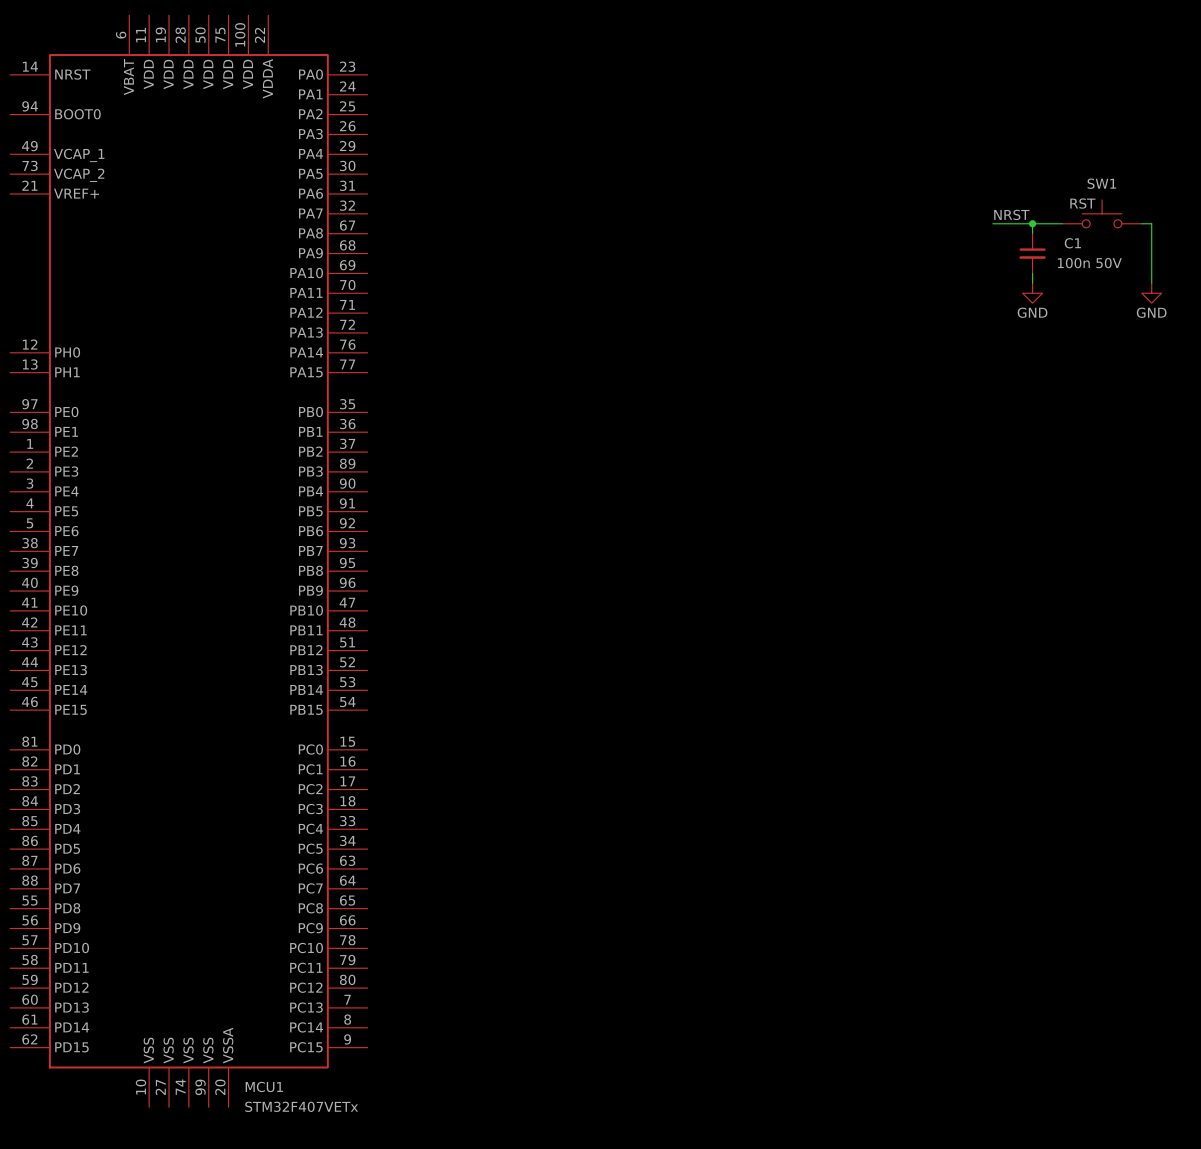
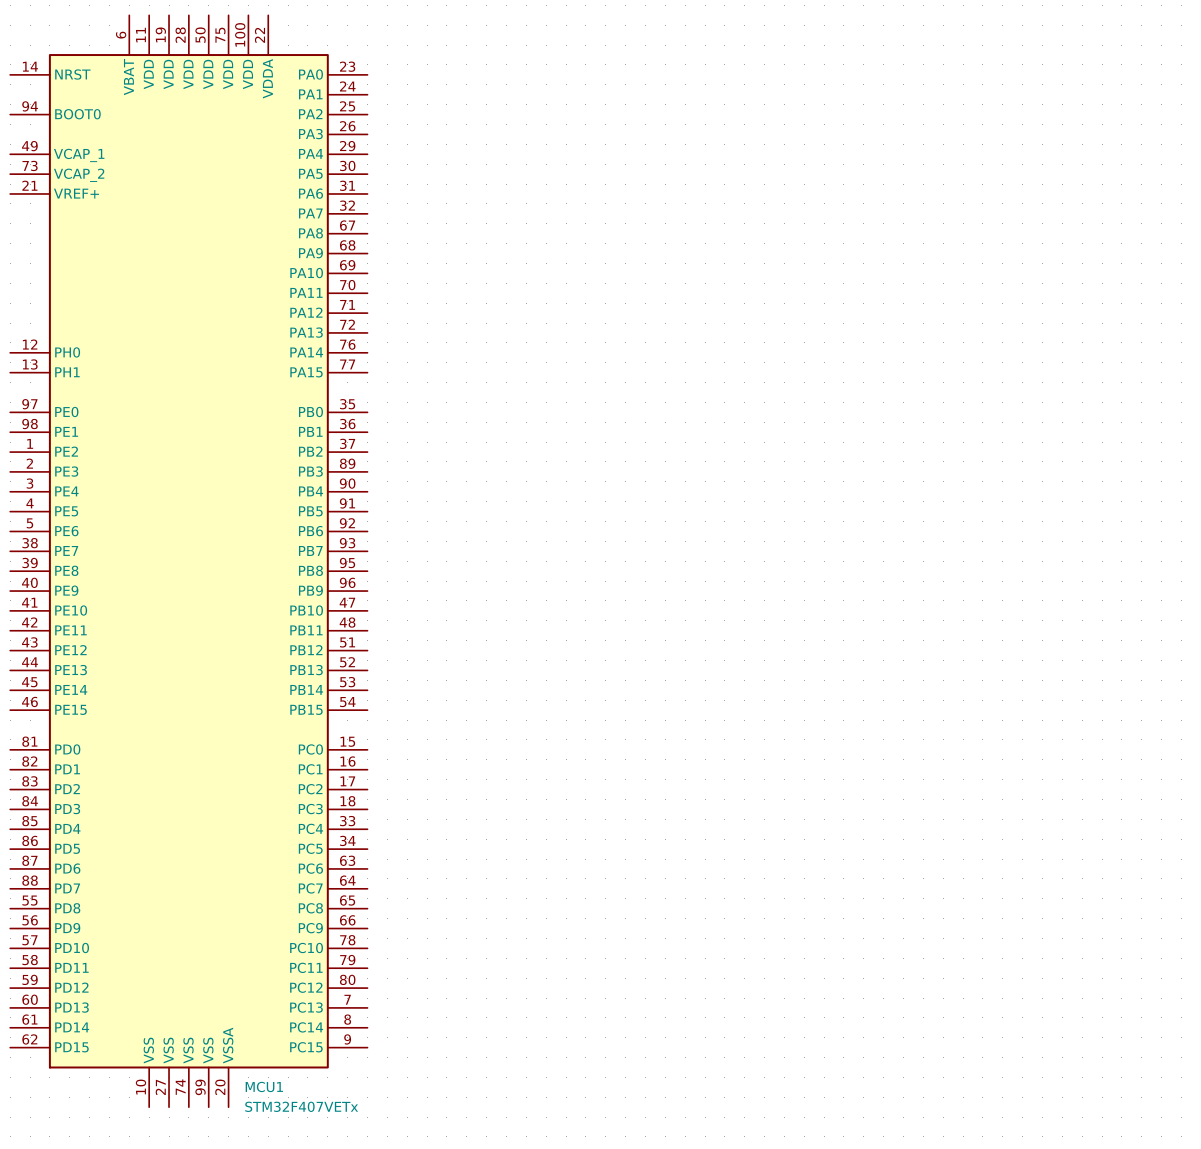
SW1: RST (1102, 213) -> none
label: NRST (1011, 214) -> none
wire: (992, 223) (1062, 223) -> none
wire: (1032, 223) (1032, 233) -> none
junction: (1032, 223) -> none
wire: (1141, 223) (1151, 223) (1151, 283) -> none
C1: 100n 50V (1032, 253) -> none
wire: (1032, 273) (1032, 283) -> none
power symbol: GND (1032, 293) -> none
power symbol: GND (1151, 293) -> none

